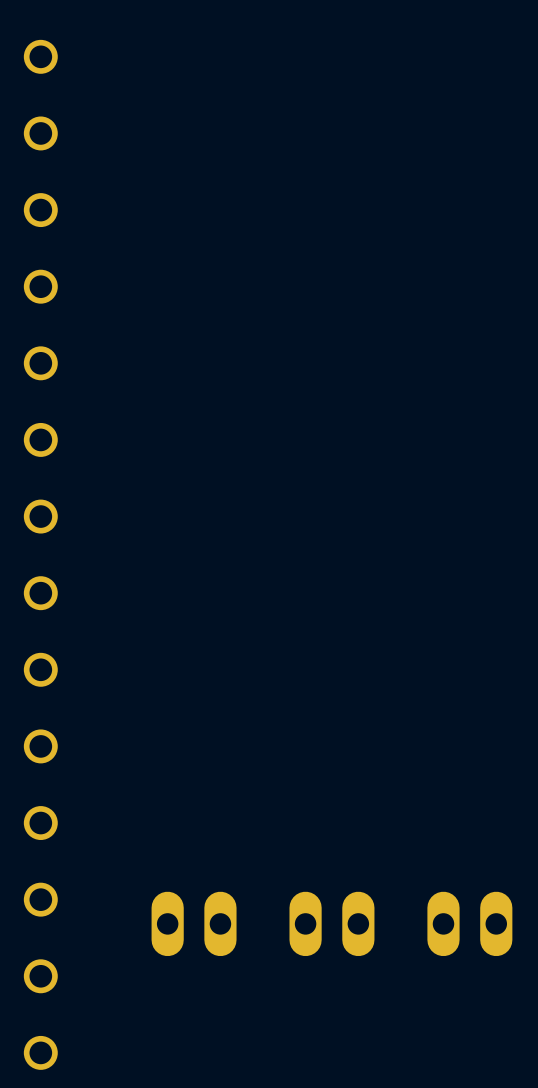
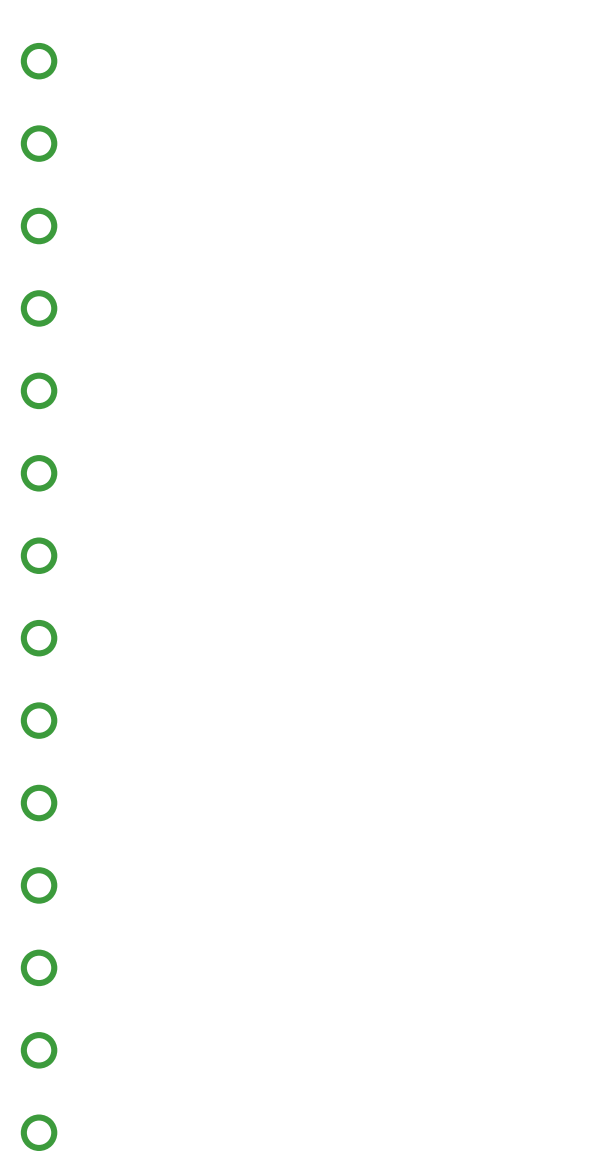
part: (194, 923) -> none
part: (331, 923) -> none
part: (469, 923) -> none

